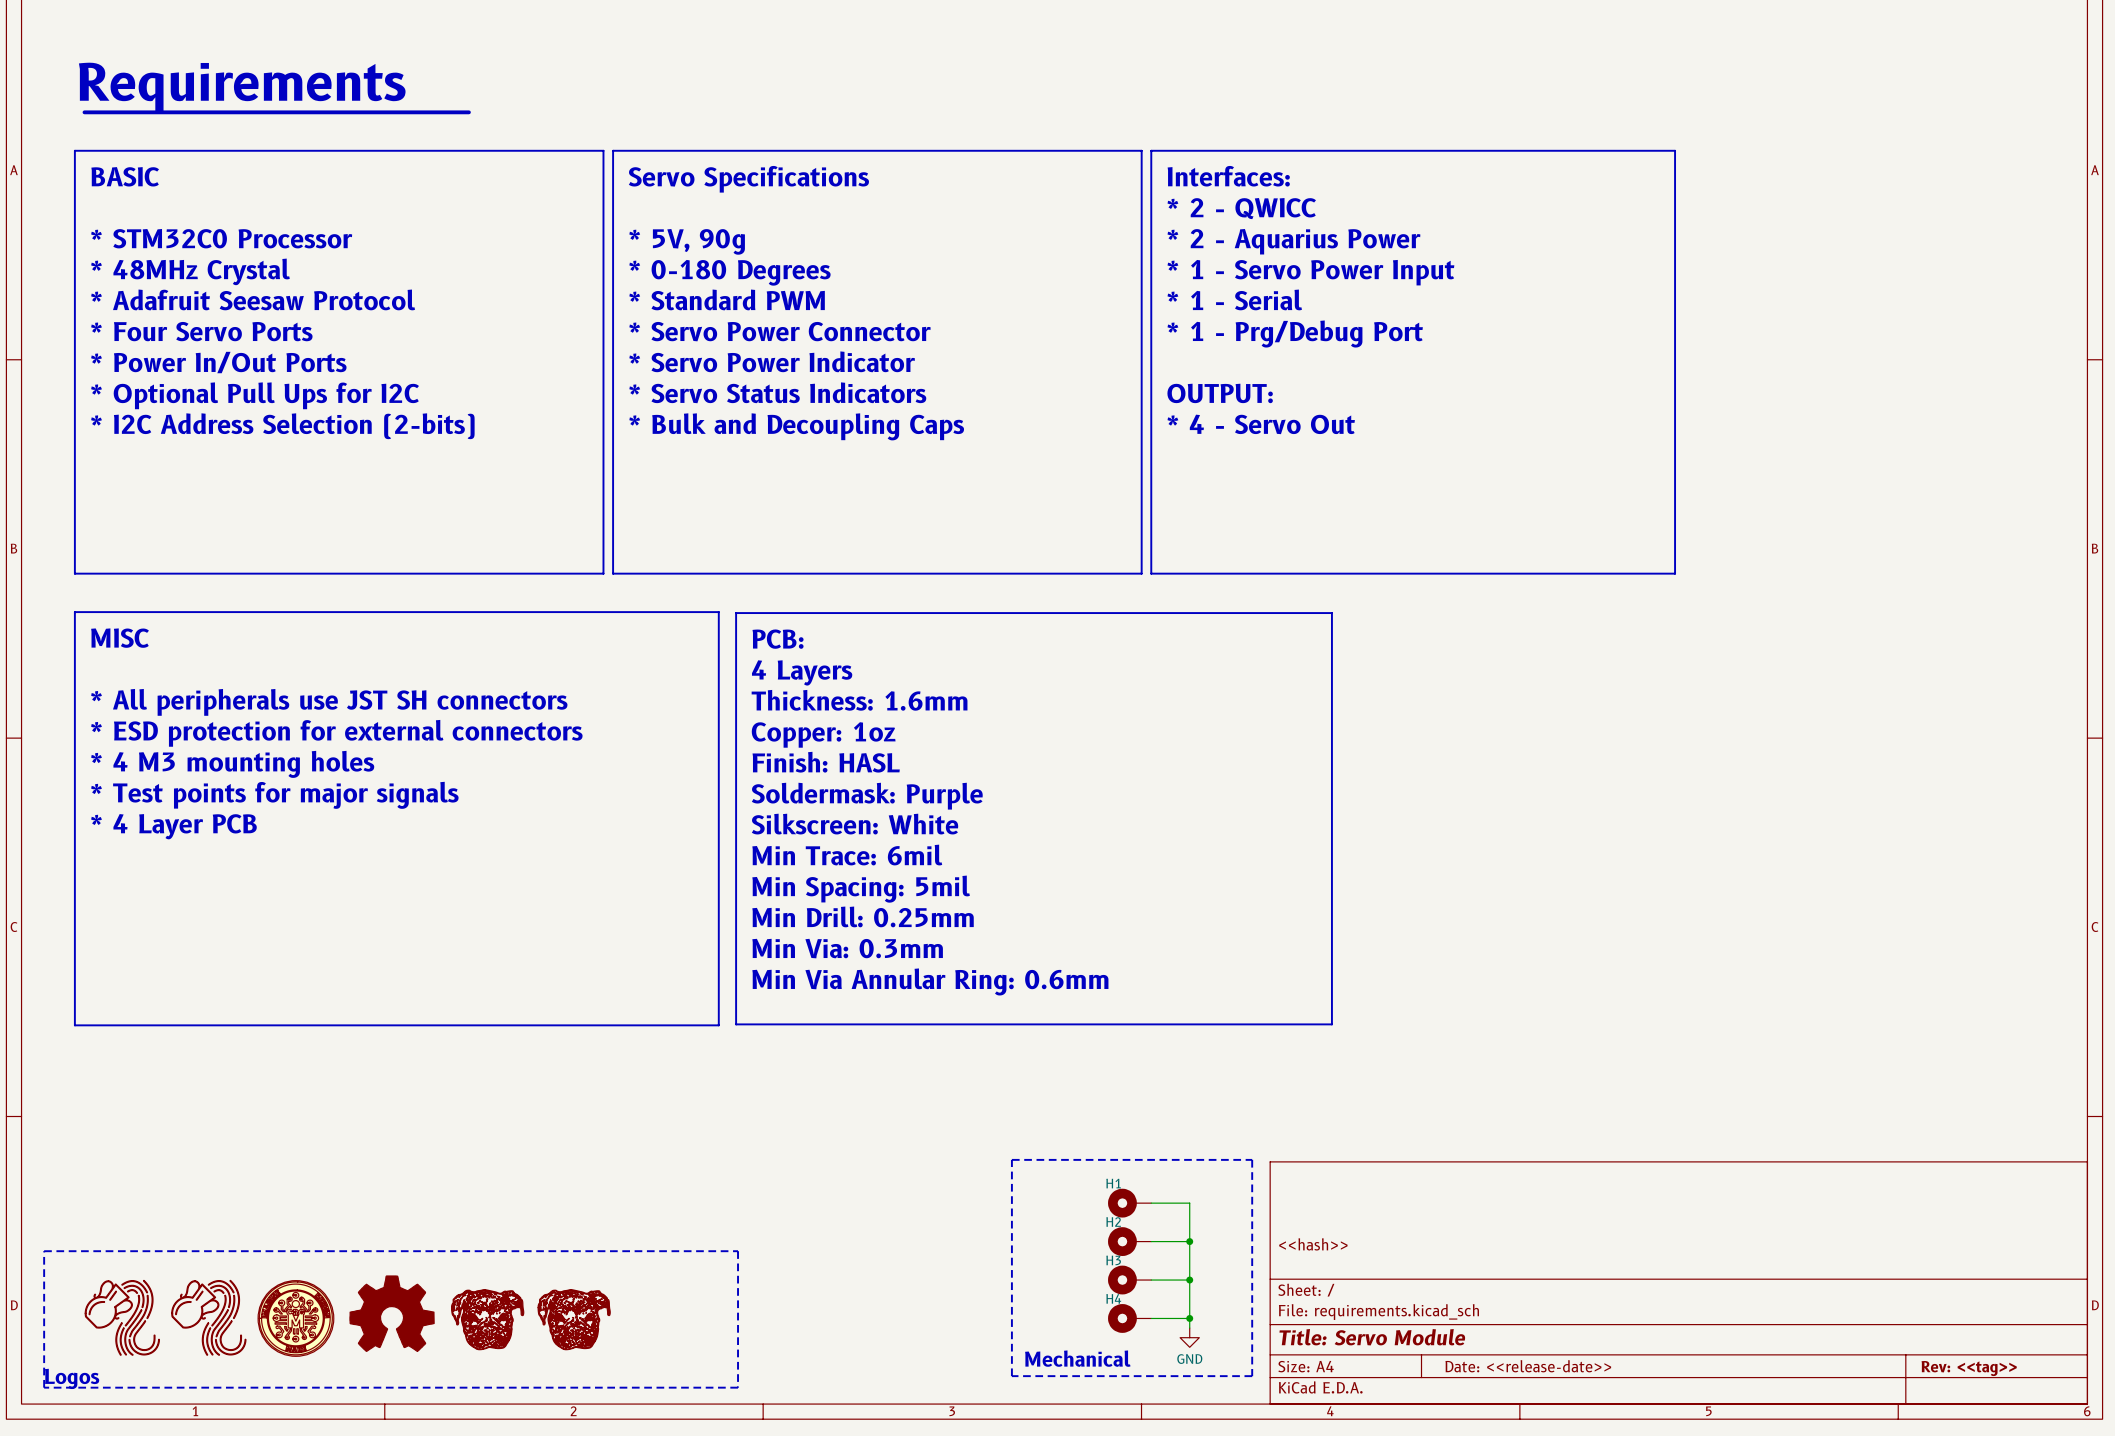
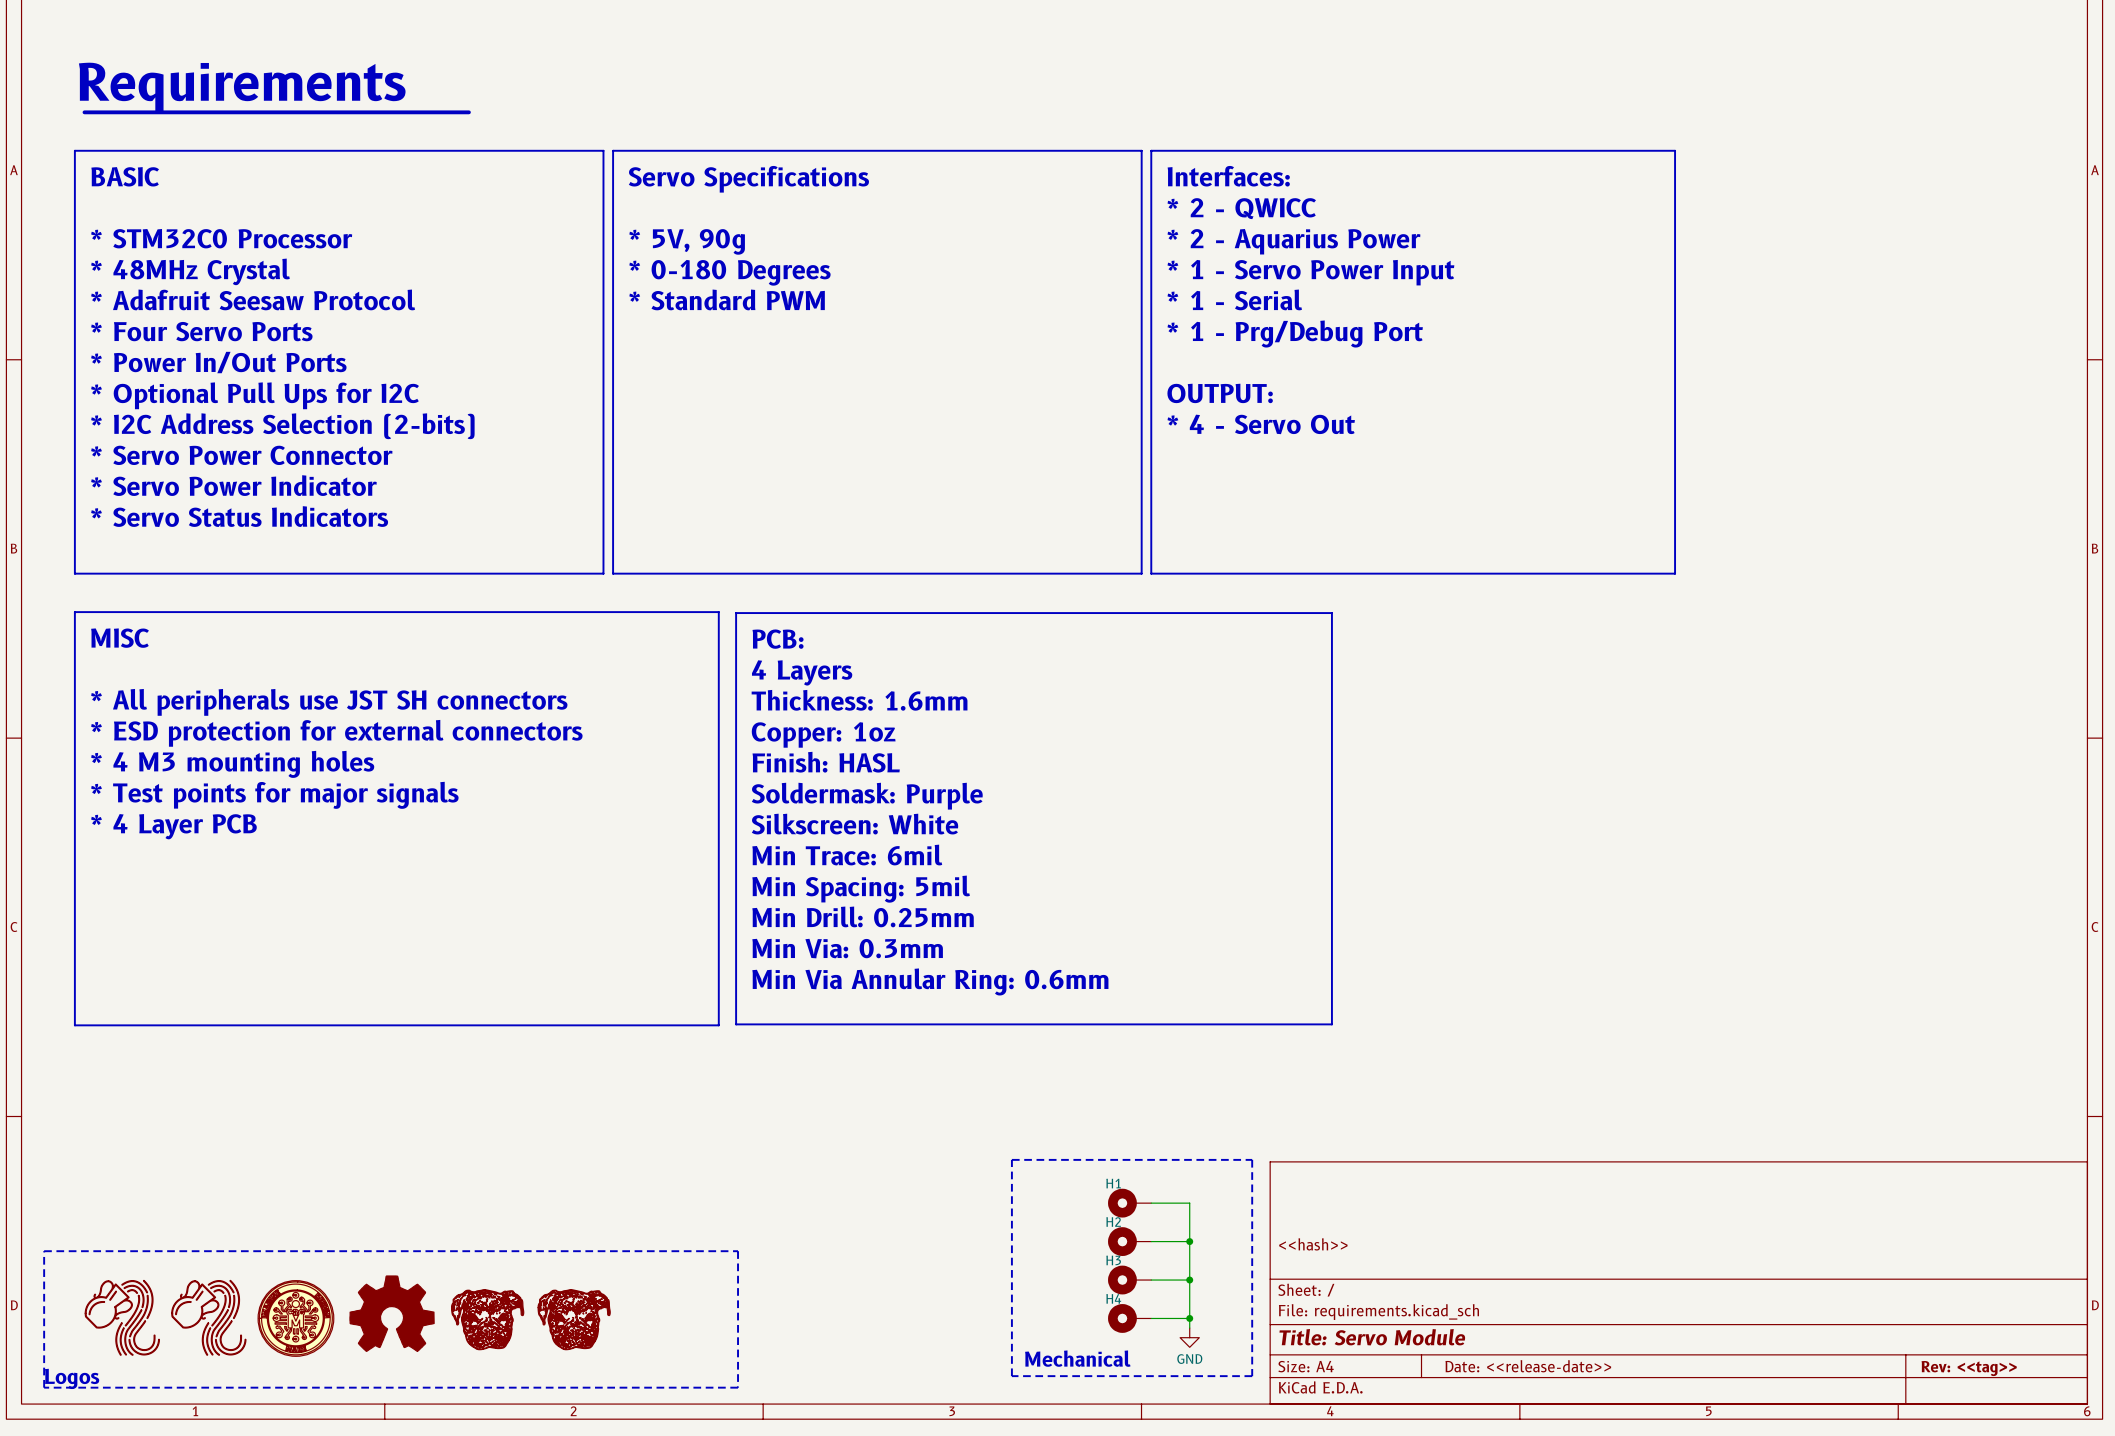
text: * Servo Power Connector (779, 331) -> none
text: * Servo Power Indicator (772, 361) -> none
text: * Servo Status Indicators (777, 392) -> none
text: * Bulk and Decoupling Caps (796, 426) -> none
text: none -> * Servo Power Connector (241, 455)
text: none -> * Servo Power Indicator (233, 485)
text: none -> * Servo Status Indicators (239, 516)

